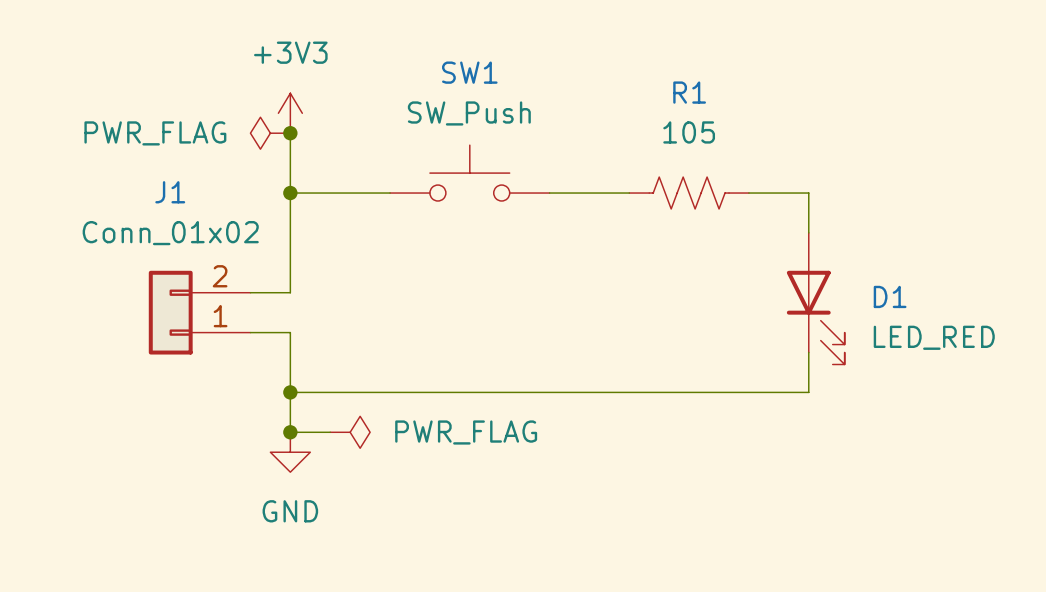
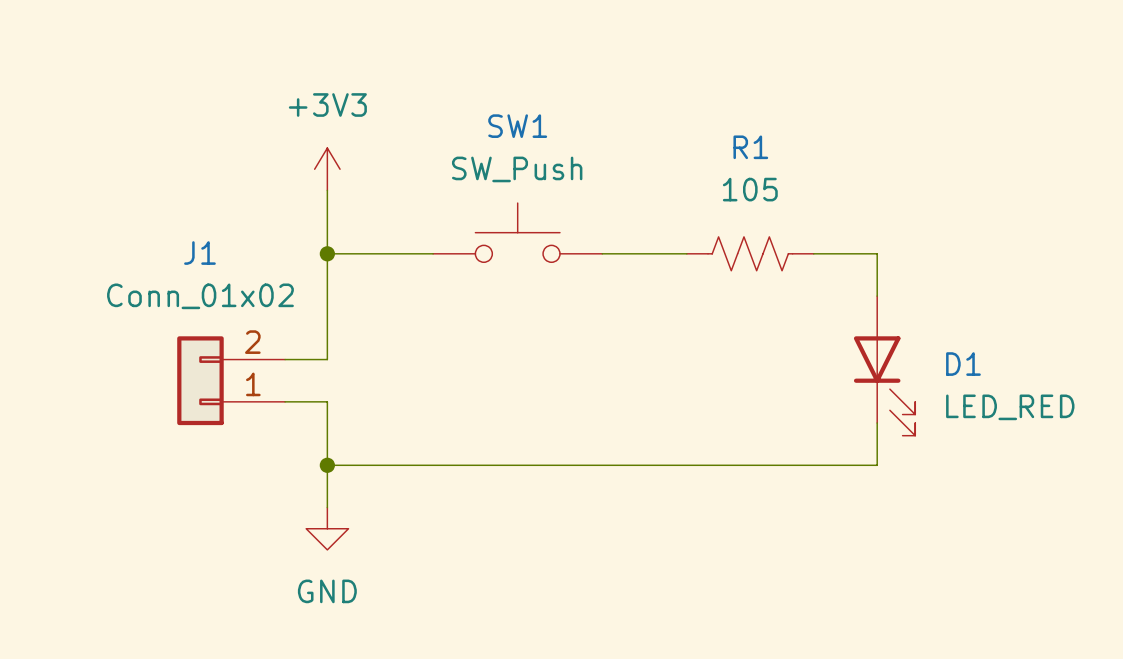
power symbol: PWR_FLAG (270, 133) -> none
junction: (290, 133) -> none
wire: (290, 432) (330, 432) -> none
junction: (290, 432) -> none
power symbol: PWR_FLAG (350, 432) -> none

